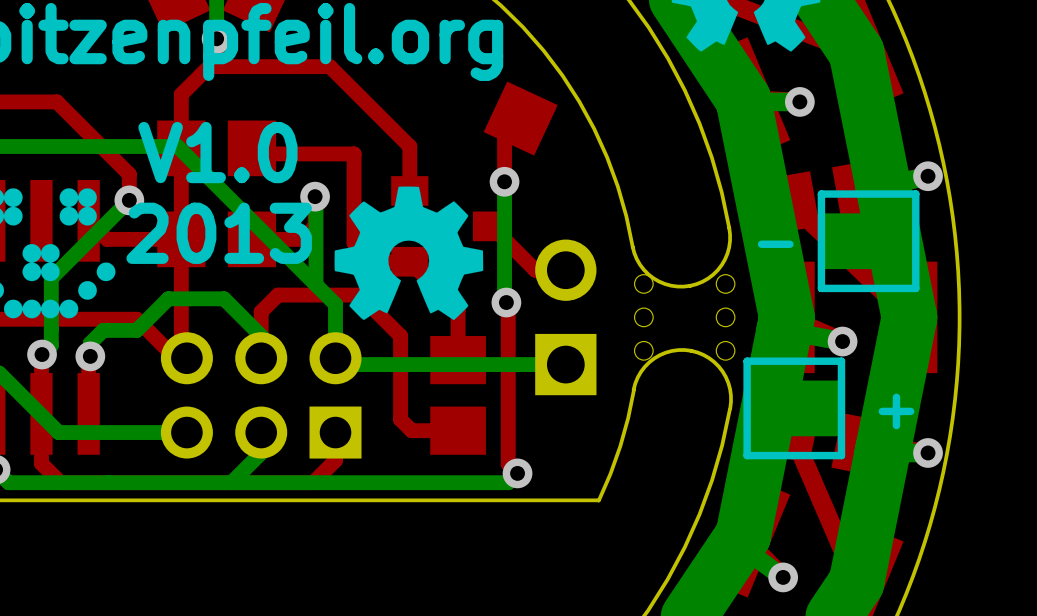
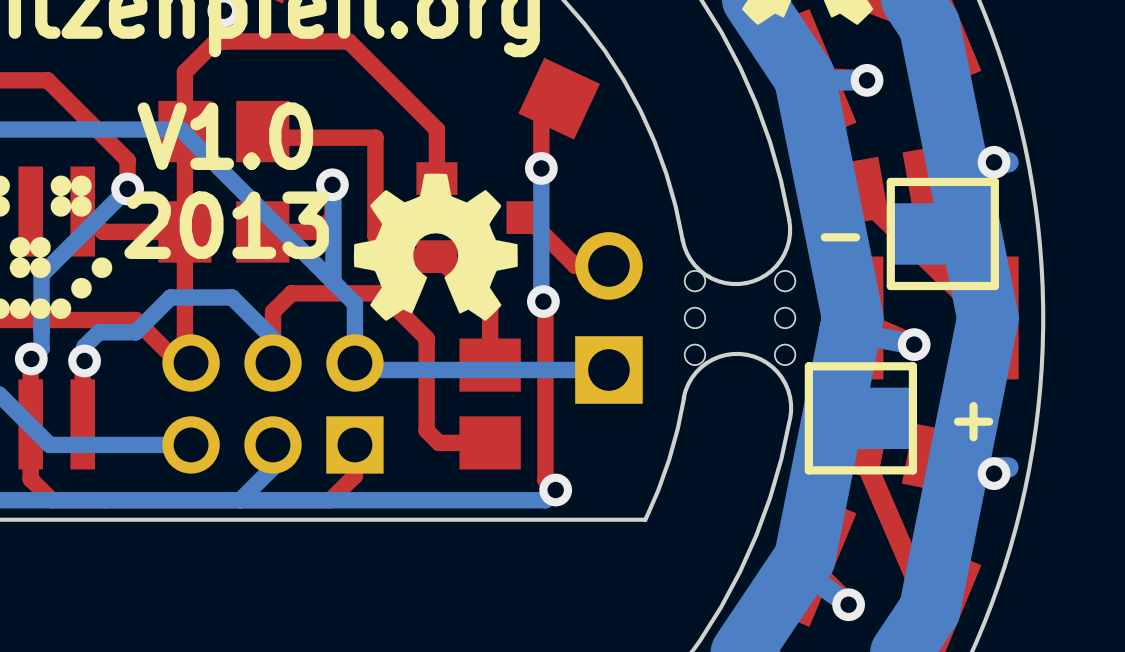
via position: (928, 176) -> (994, 162)
via position: (928, 452) -> (994, 473)

